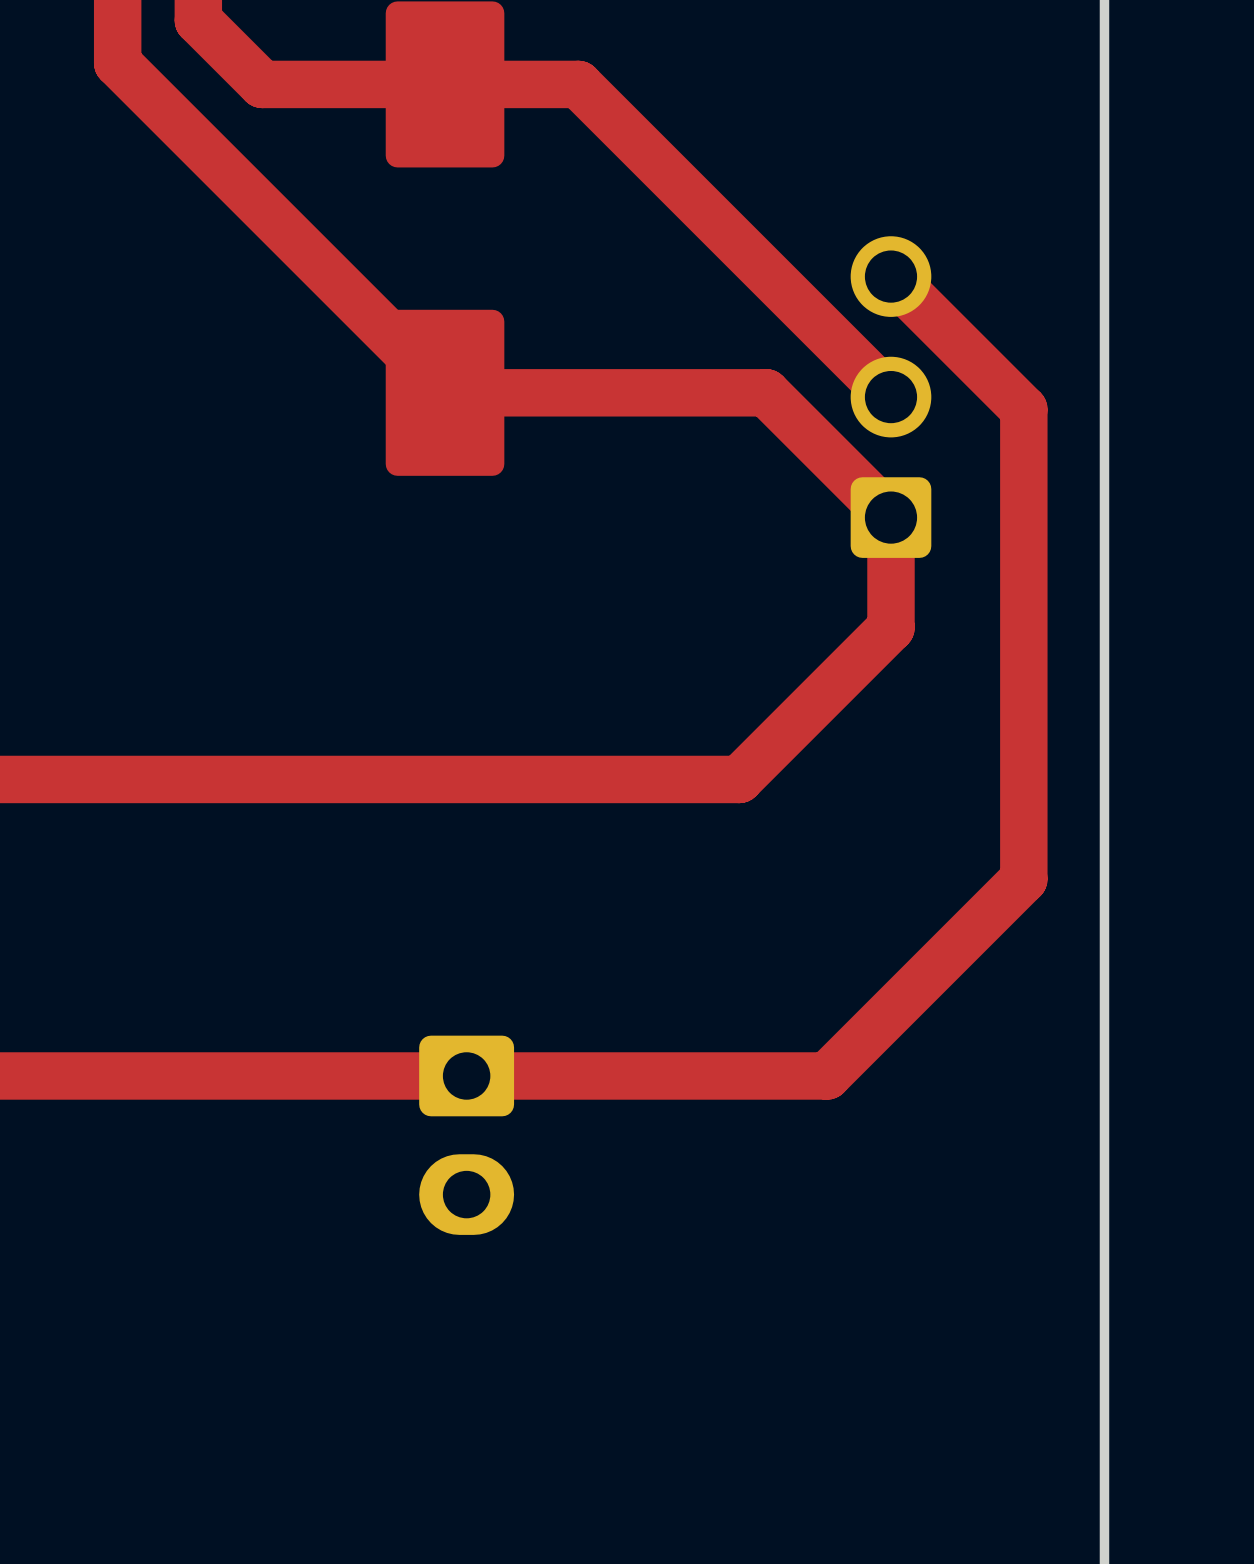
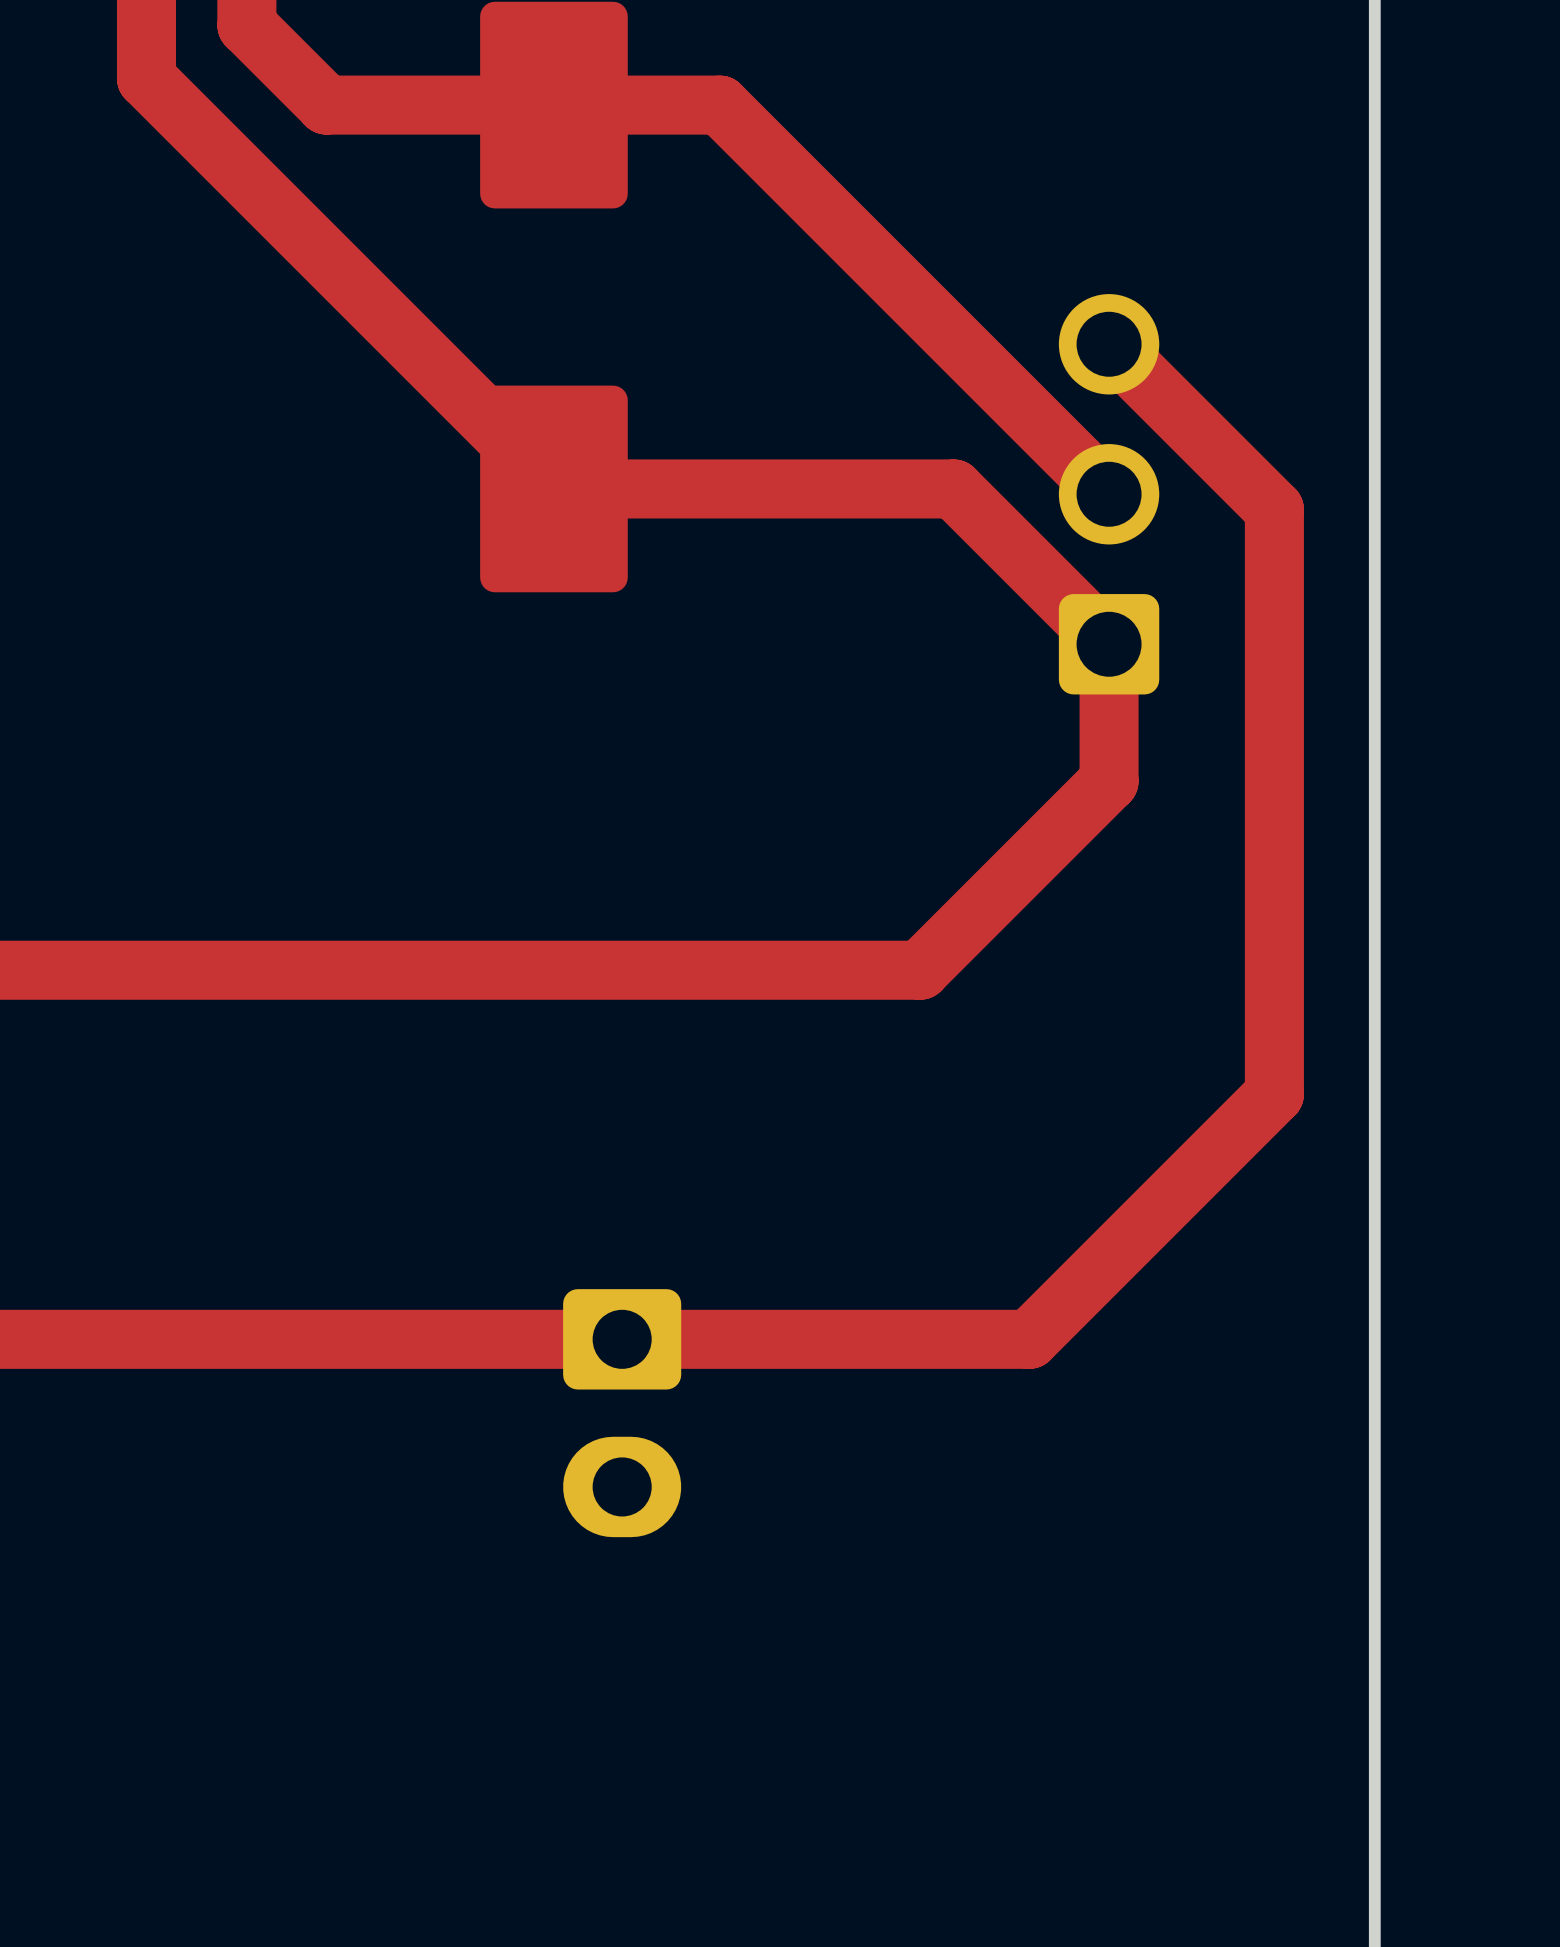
part position: (466, 1135) -> (622, 1413)

